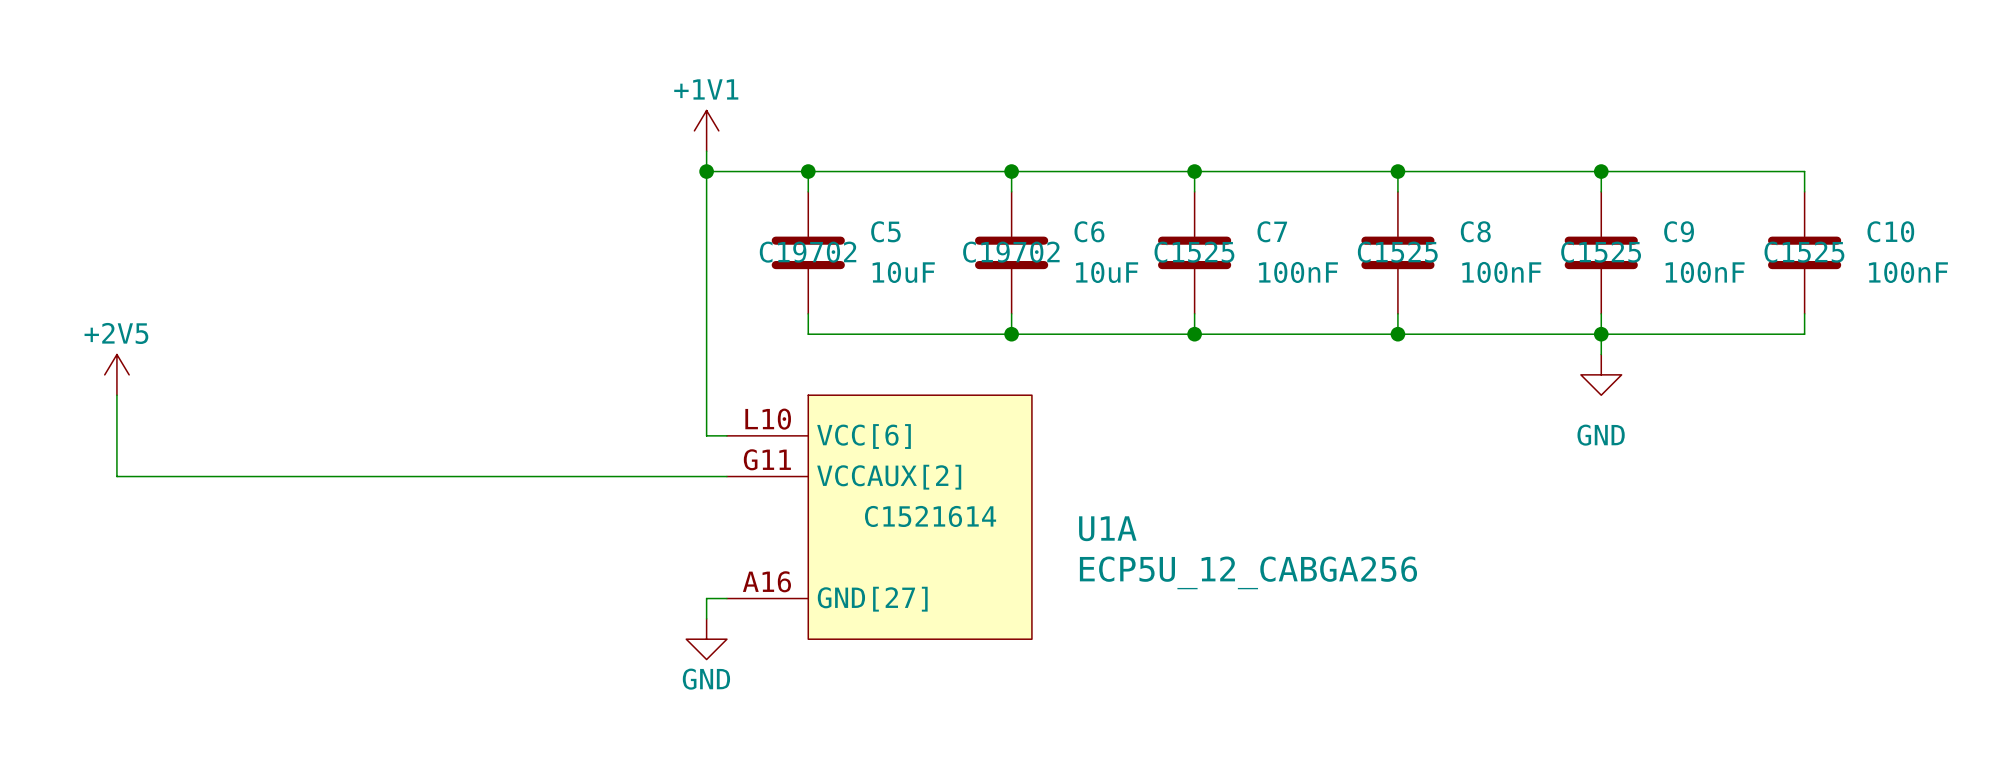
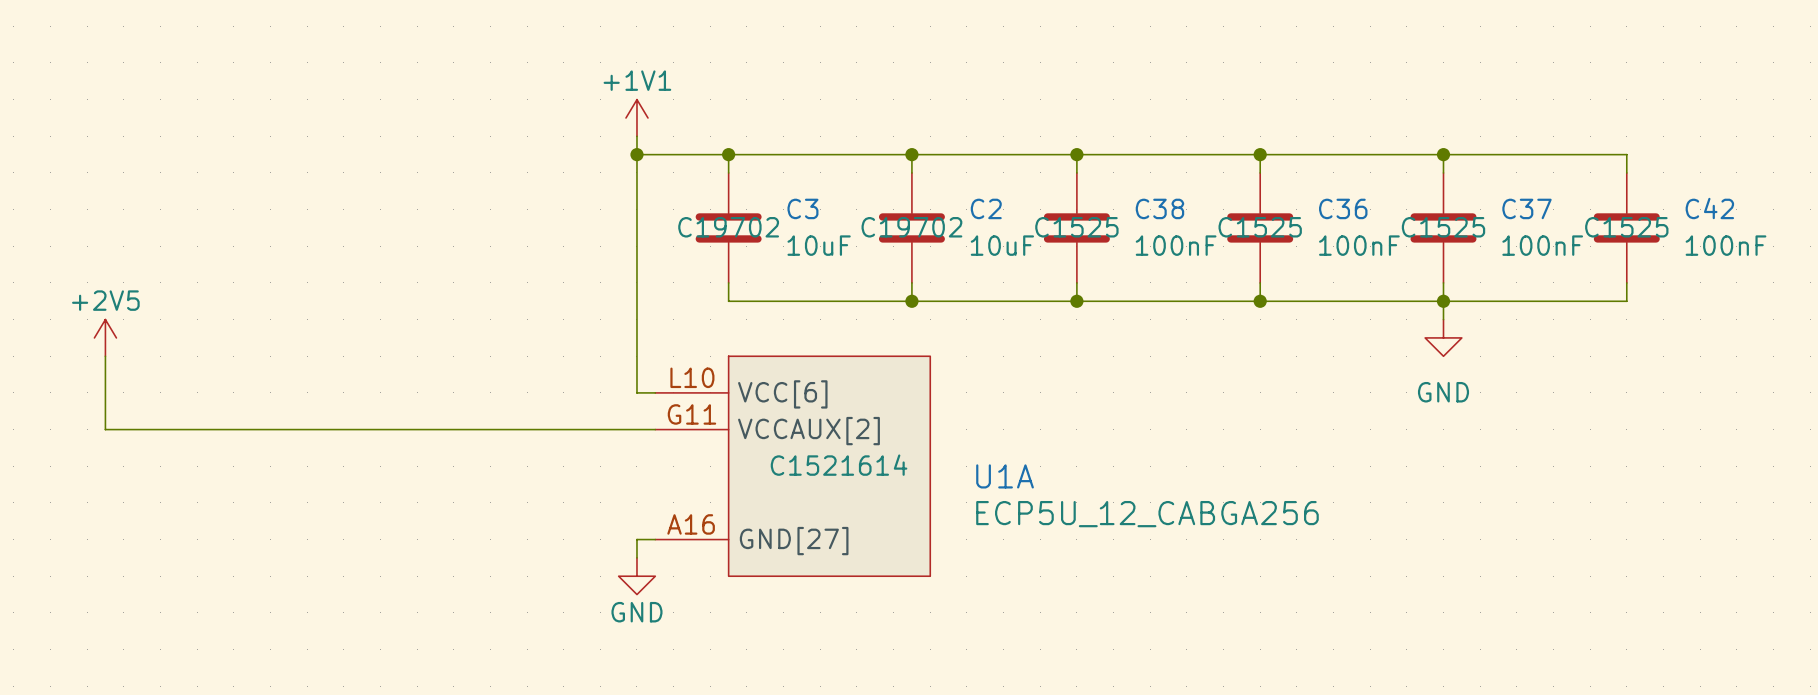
C5 name: C5 (885, 231) -> C3 (802, 208)
C6 name: C6 (1089, 231) -> C2 (986, 208)
C7 name: C7 (1272, 231) -> C38 (1159, 208)
C8 name: C8 (1475, 231) -> C36 (1343, 208)
C9 name: C9 (1679, 231) -> C37 (1526, 208)
C10 name: C10 (1890, 231) -> C42 (1709, 208)

